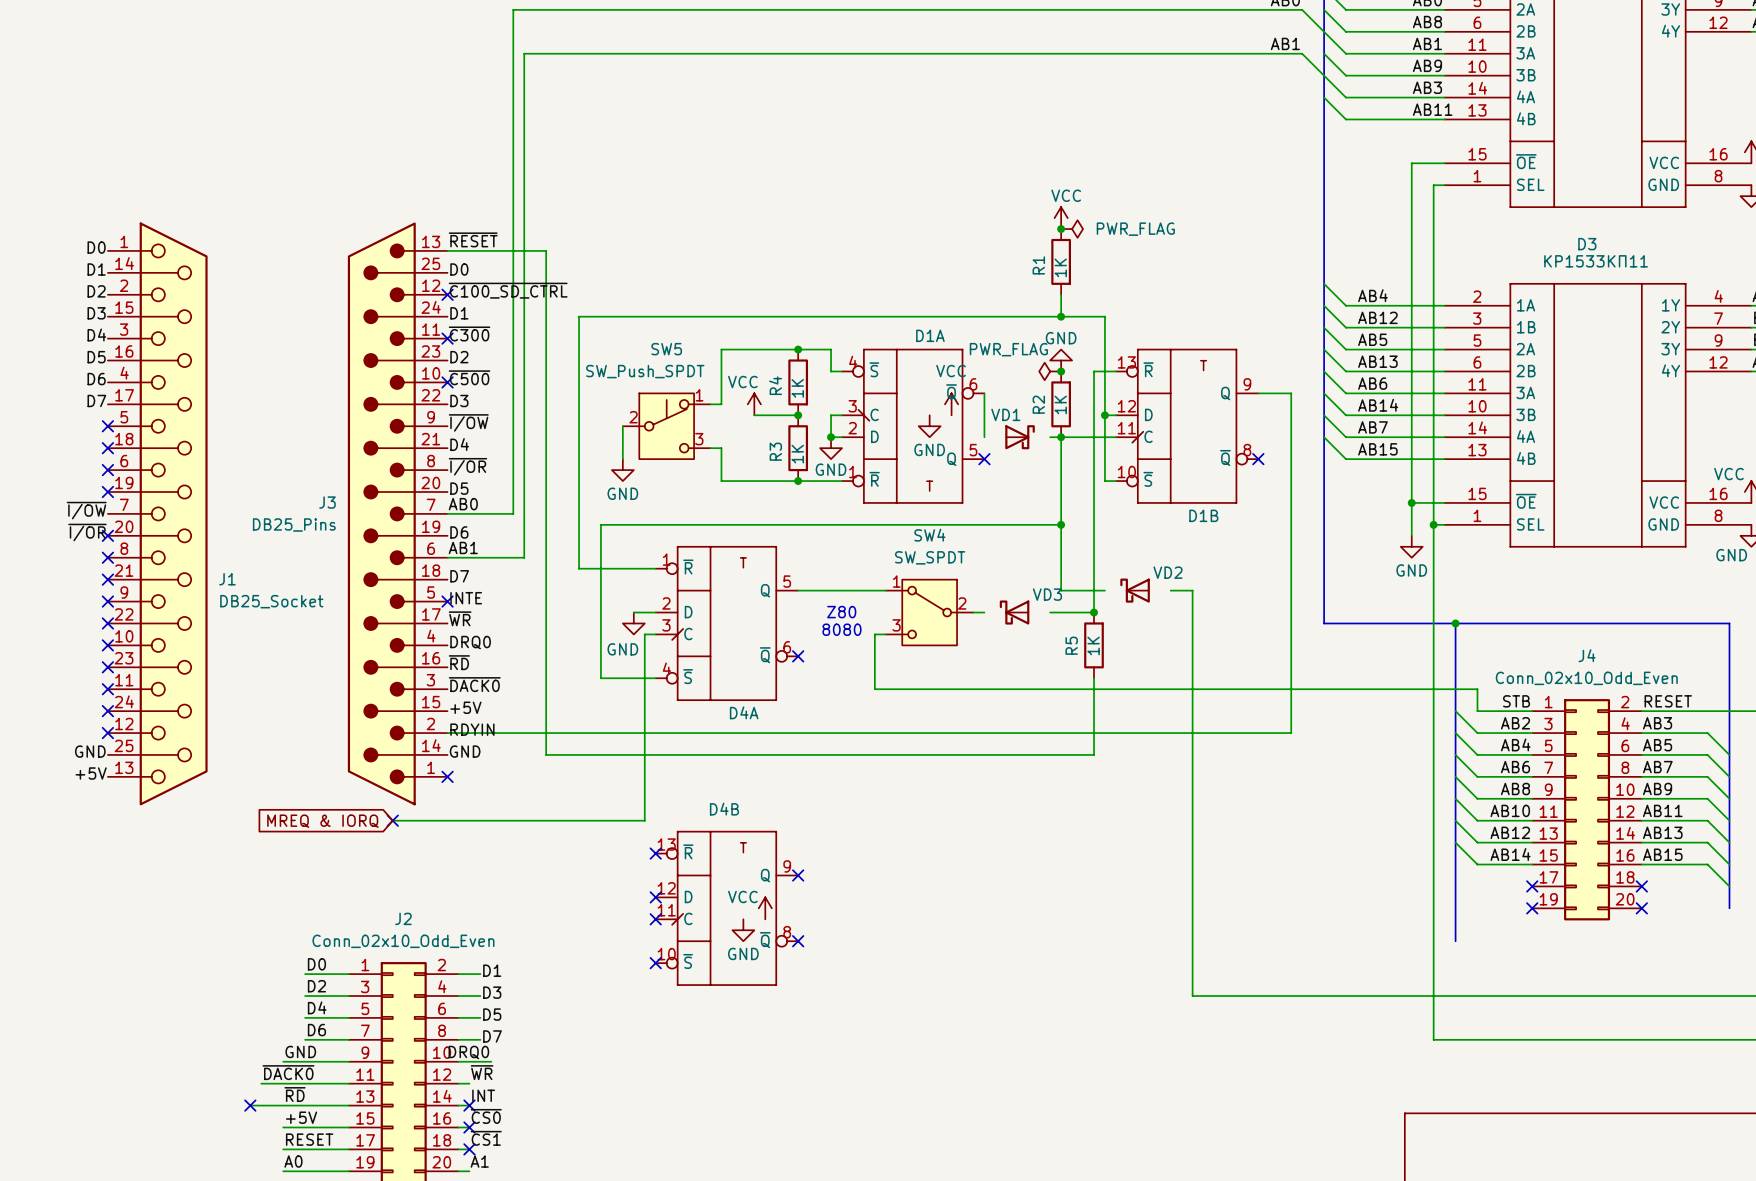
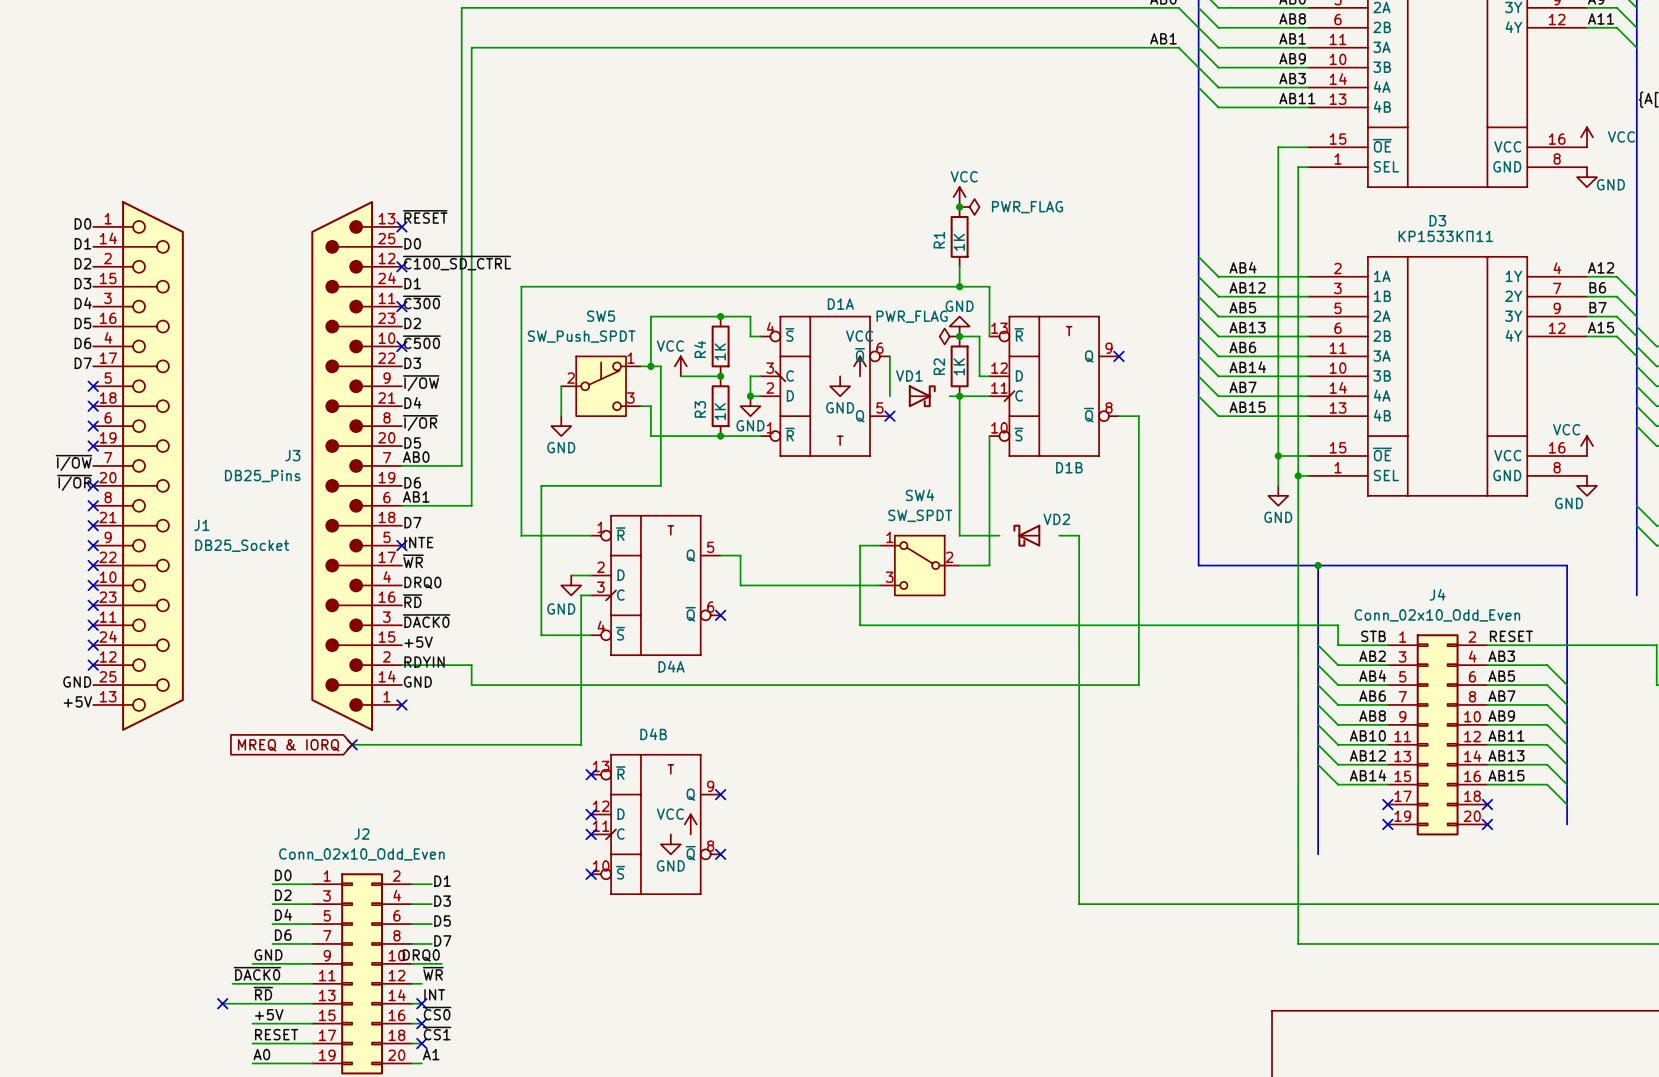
wire: (447, 250) (546, 250) (546, 754) -> (471, 665) (471, 685) (491, 685)
no-connect mark: none -> (401, 226)
wire: (1093, 316) (1104, 316) (1104, 481) (1115, 481) -> (989, 286) (989, 336)
wire: none -> (959, 336) (979, 336) (979, 376) (989, 376)
wire: (1115, 371) (1093, 371) (1093, 481) -> none
no-connect mark: none -> (1118, 356)
wire: (1258, 393) (1291, 393) (1291, 733) (524, 733) -> none
junction: none -> (650, 366)
junction: (1104, 415) -> none
D1B position: (1187, 426) -> (1054, 386)
no-connect mark: (1258, 459) -> none
wire: (1061, 524) (600, 524) (600, 535) -> (650, 366) (660, 366) (660, 485) (541, 485)
junction: (1061, 524) -> none
wire: (579, 568) (655, 568) -> (521, 515) (521, 535) (591, 535)
wire: (798, 590) (885, 590) -> none
wire: (633, 612) (655, 612) -> none
wire: none -> (720, 555) (740, 555) (740, 585) (879, 585)
text: Z80 (841, 612) -> none
SW4 position: (929, 612) -> (919, 565)
wire: (973, 612) (984, 612) -> none
VD3: (1014, 612) -> none
wire: (1050, 612) (1093, 612) -> (959, 565) (989, 565) (989, 555)
junction: (1093, 612) -> none
power symbol position: GND (633, 623) -> GND (571, 585)
D4A position: (726, 623) -> (655, 585)
text: 8080 (841, 629) -> none
wire: none -> (571, 575) (581, 575)
wire: (644, 634) (644, 656) -> (591, 595) (581, 595)
wire: (885, 634) (874, 634) (874, 689) (951, 689) -> (879, 545) (860, 545) (860, 625)
R5: 1K (1093, 645) -> none
no-connect mark position: (798, 656) -> (720, 615)
wire: (600, 678) (655, 678) -> (541, 615) (541, 635) (591, 635)
wire: (1093, 678) (1093, 754) -> (1118, 416) (1138, 416) (1138, 685) (989, 685)

